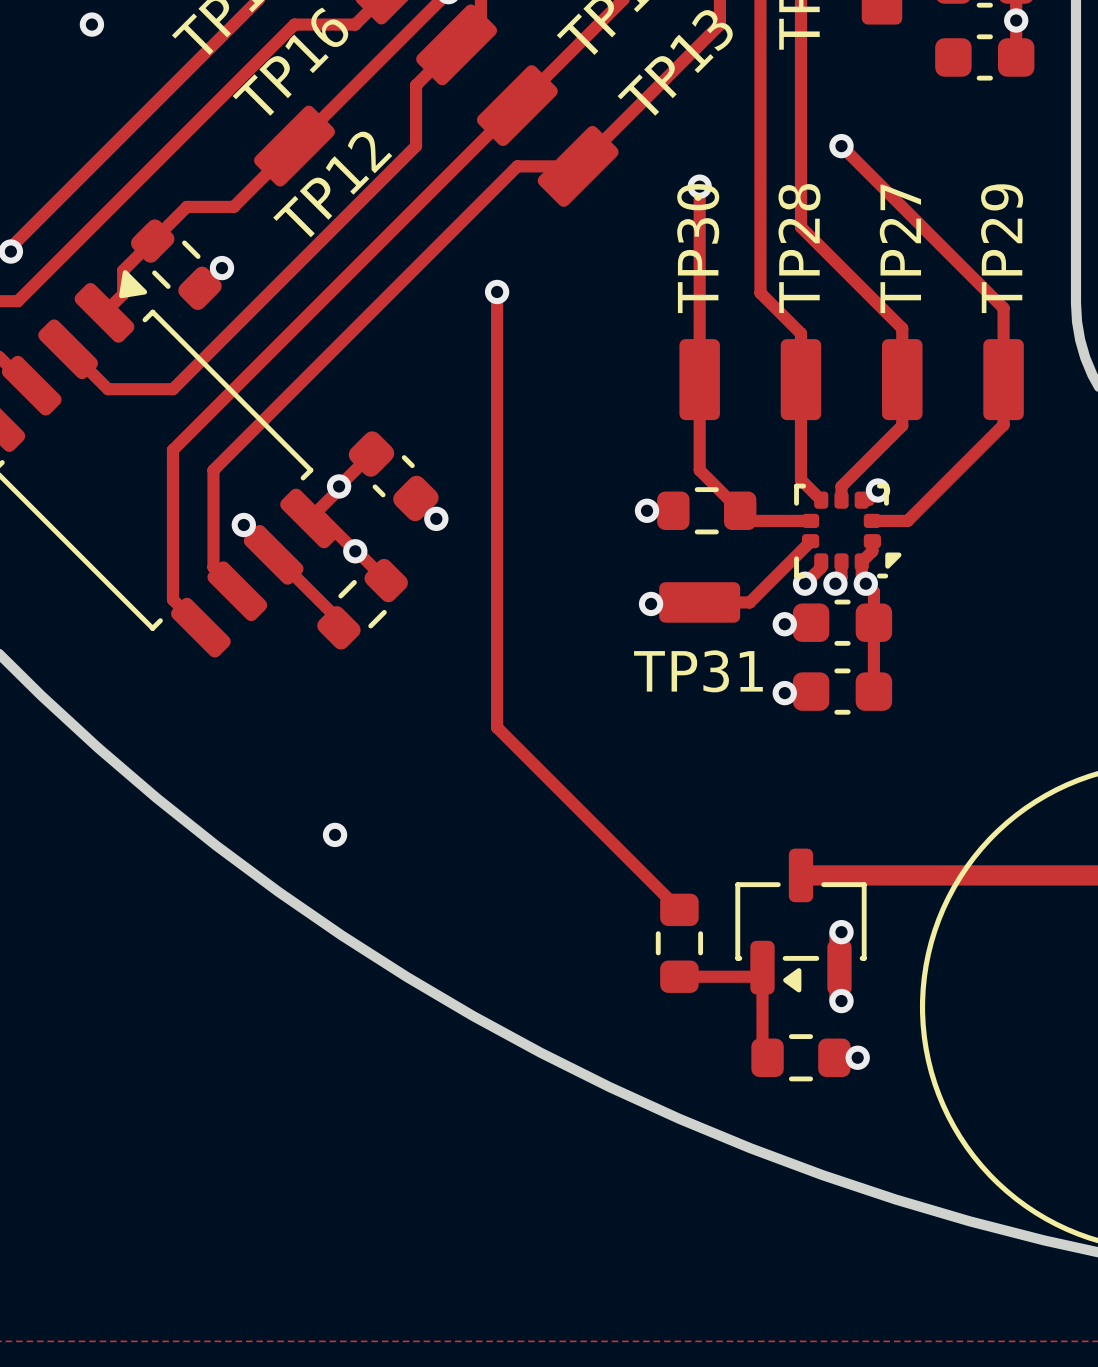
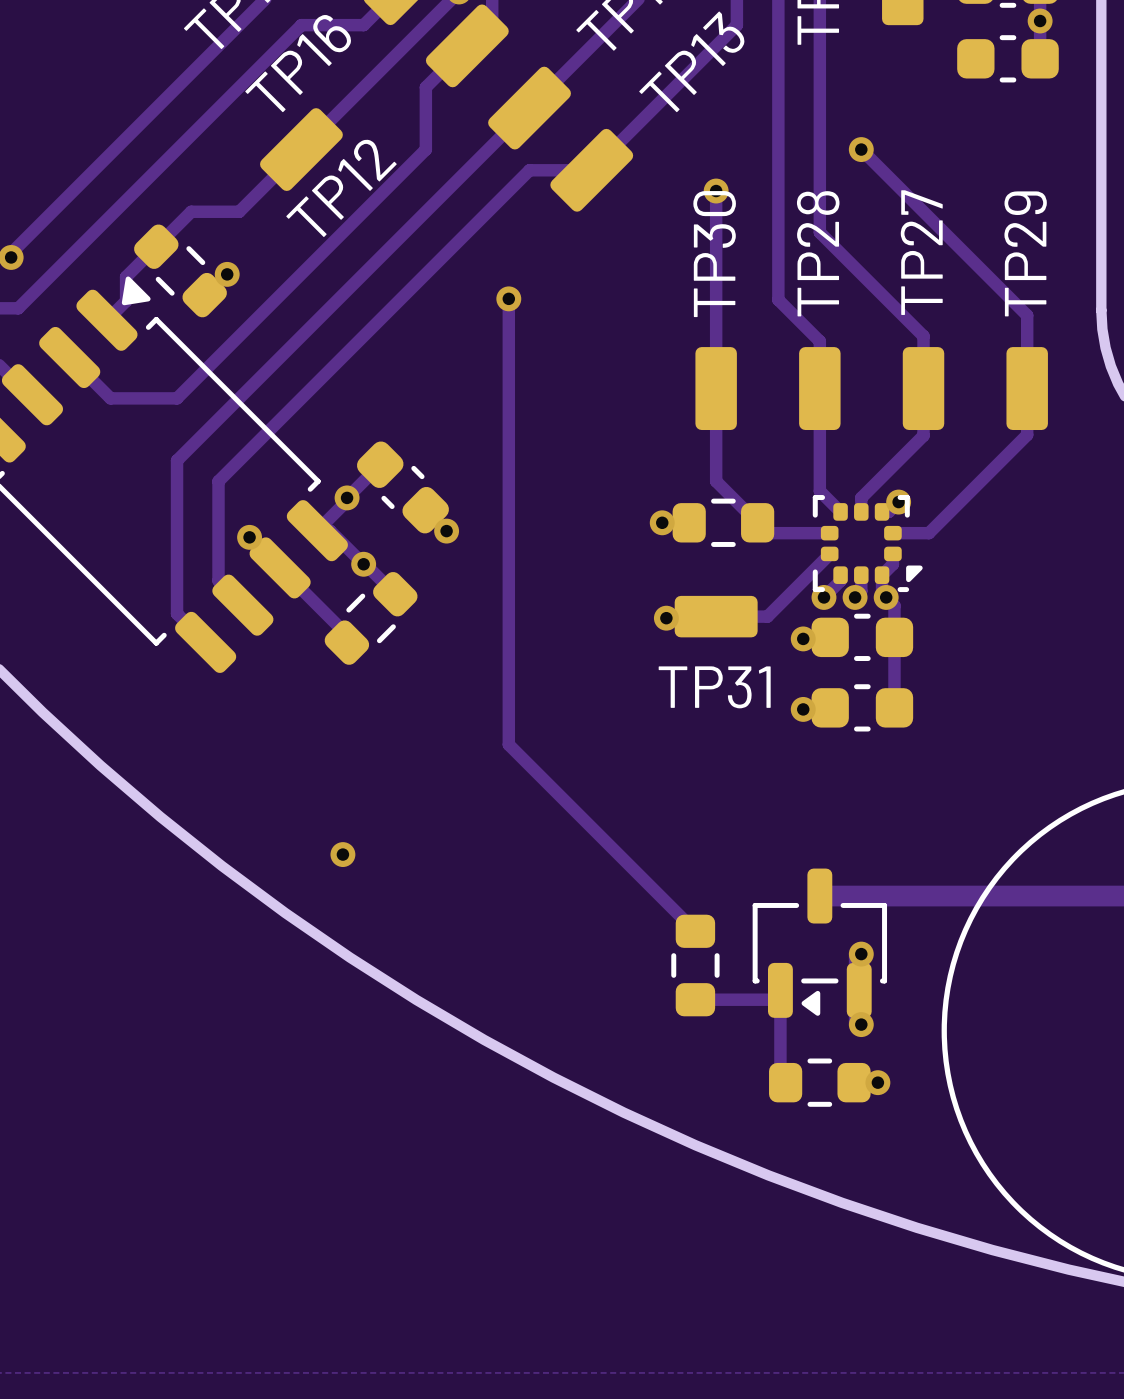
via: (91, 24) -> none

